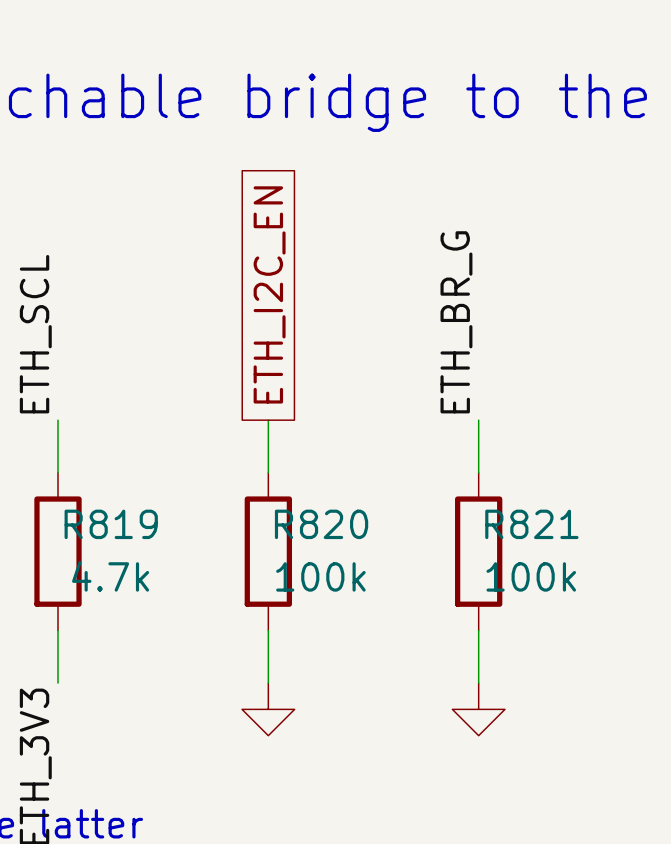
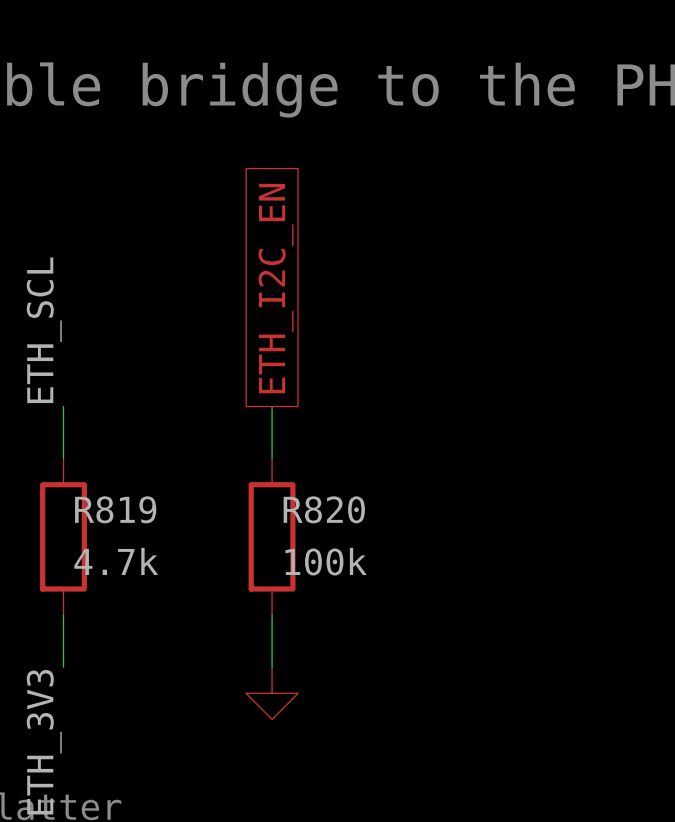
label: ETH_BR_G (456, 322) -> none
wire: (478, 420) (478, 472) -> none
R821: 100k (478, 551) -> none
wire: (478, 630) (478, 683) -> none
power symbol: (478, 709) -> none

